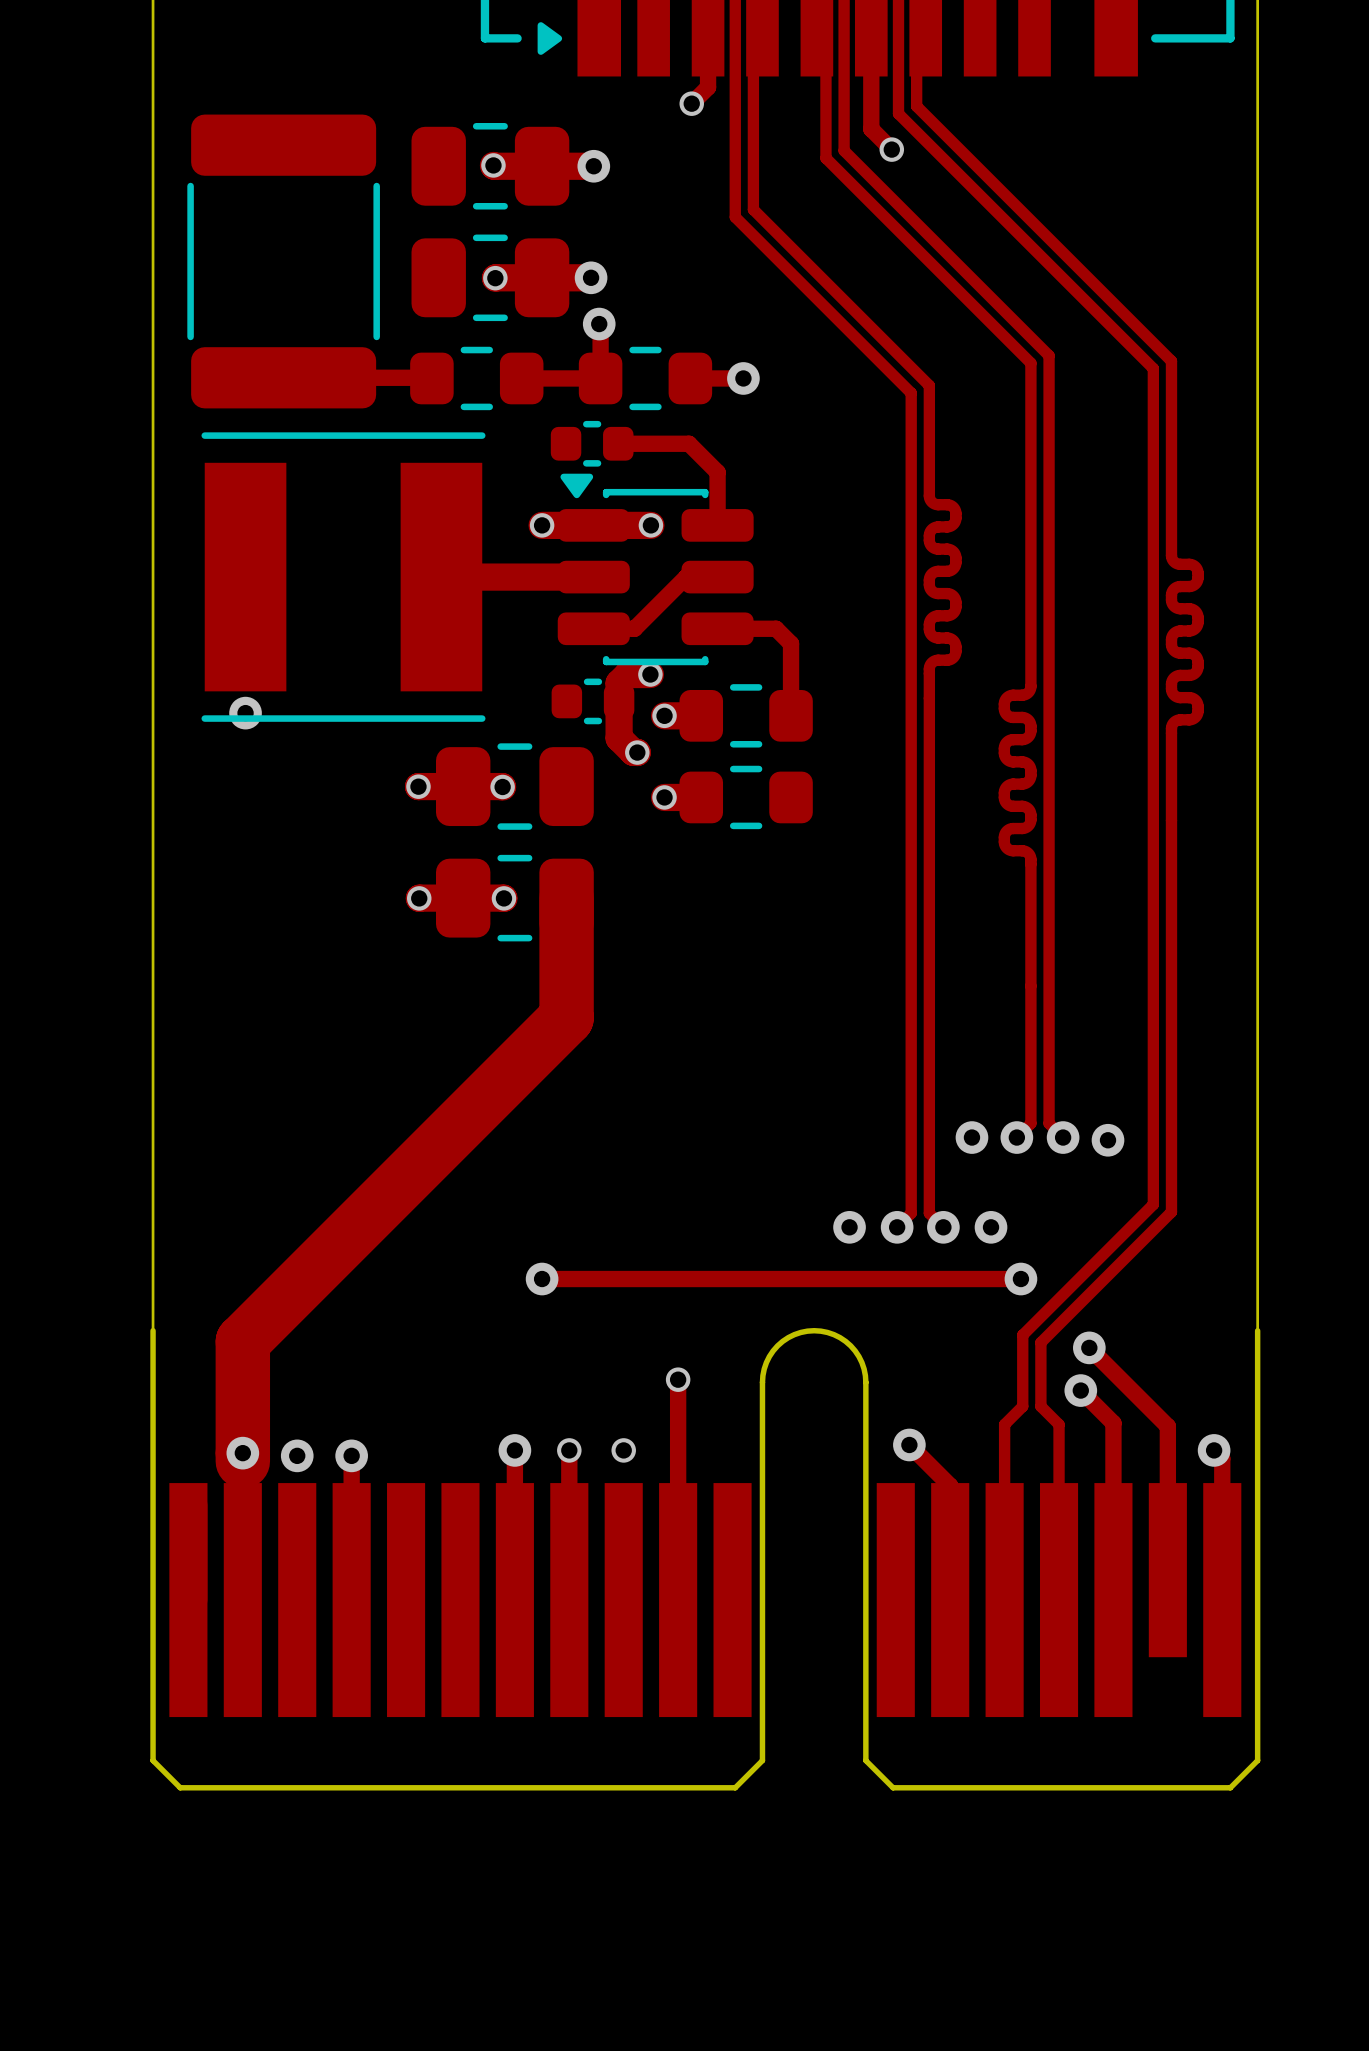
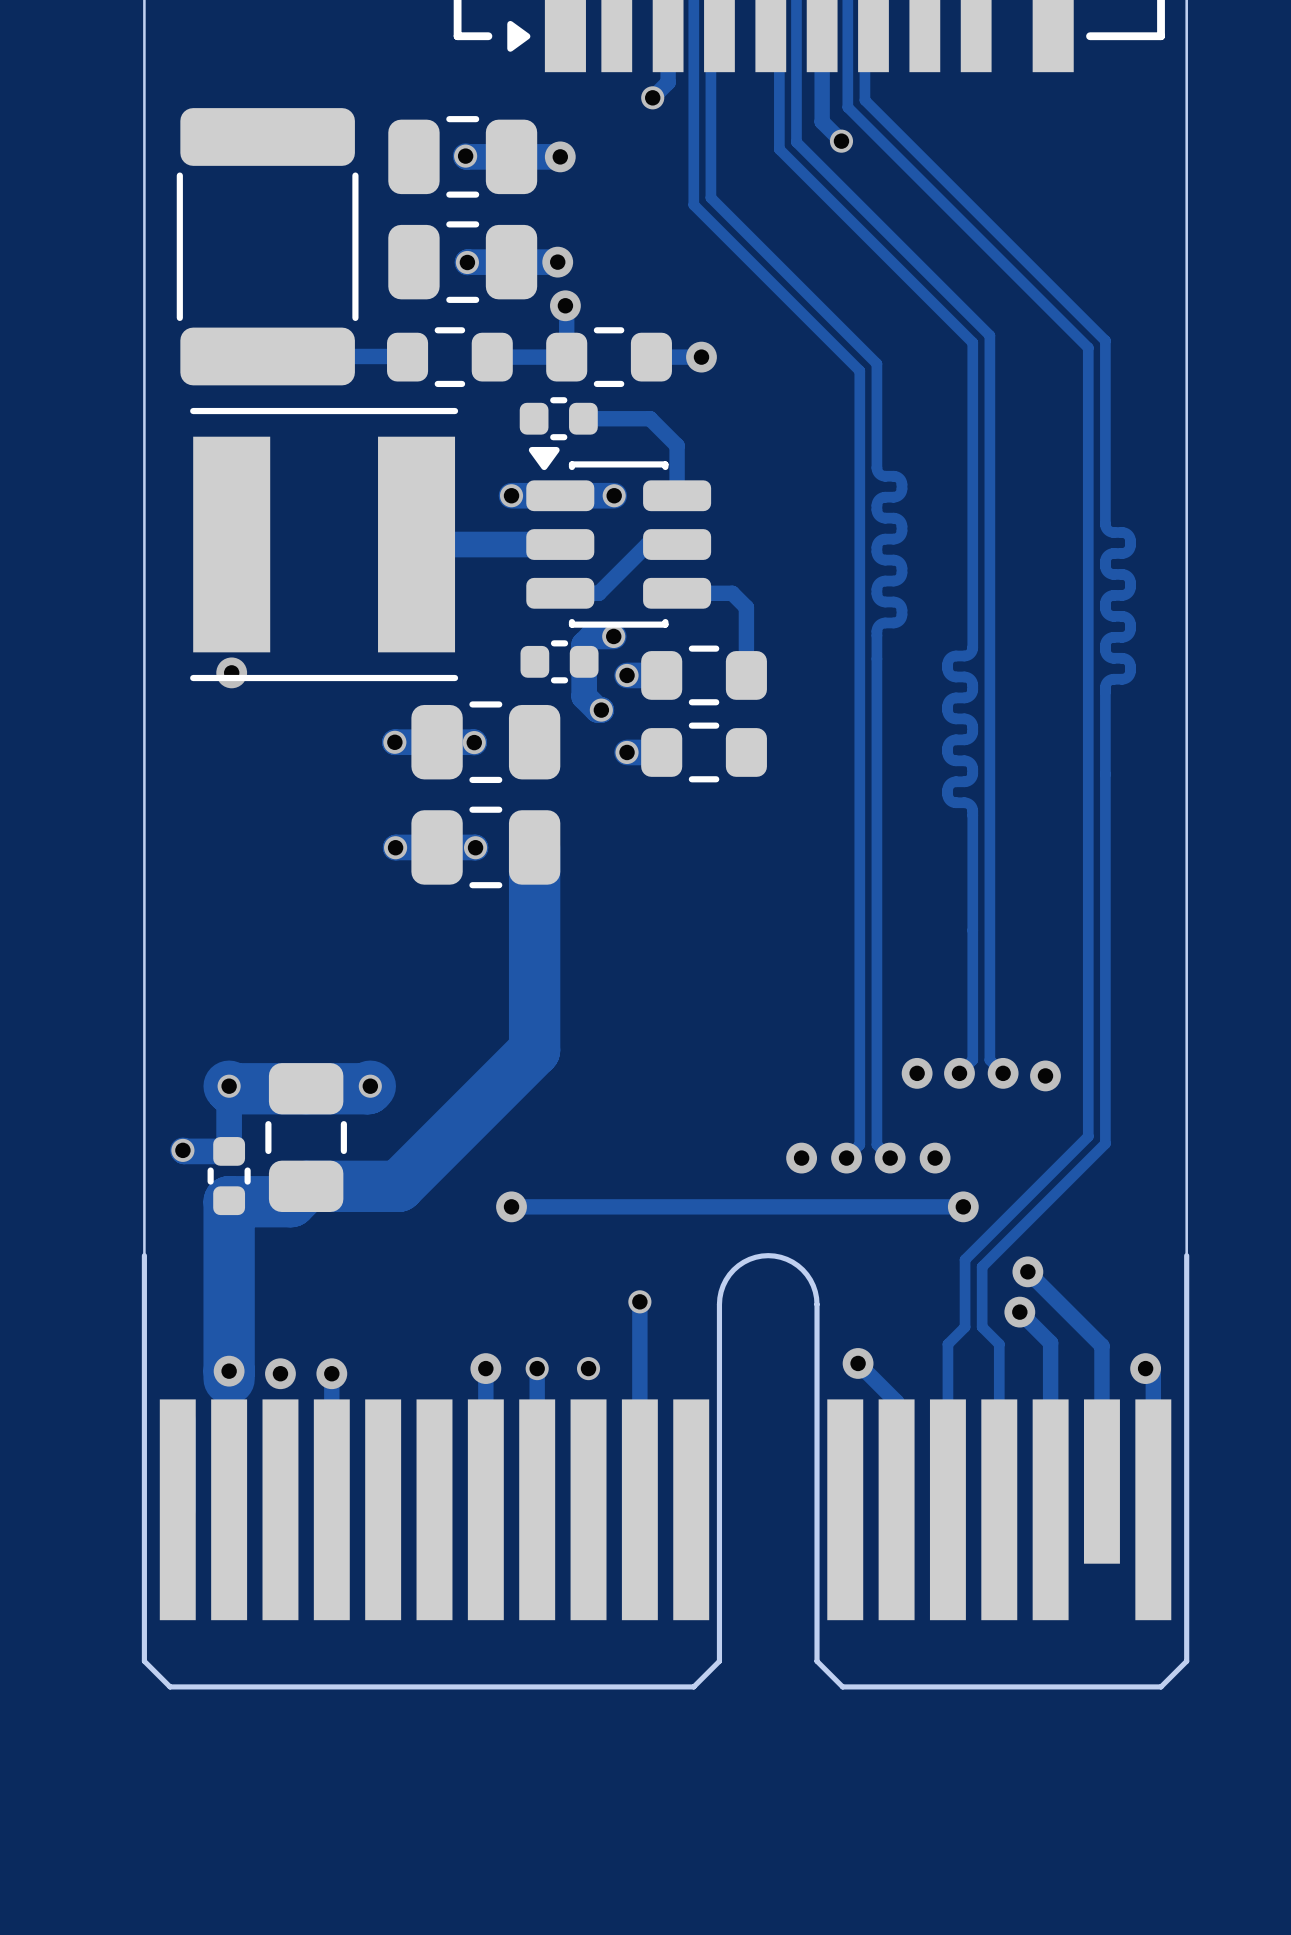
track: (566, 1017) (242, 1341) -> (534, 960) (534, 1050) (398, 1186) (306, 1186) (290, 1201) (229, 1201) (229, 1265)
via: none -> (229, 1086)
track: none -> (370, 1086) (367, 1088) (231, 1088) (229, 1086) (229, 1151) (182, 1150)
via: none -> (370, 1086)
part: none -> (306, 1137)
via: none -> (182, 1150)
part: none -> (229, 1176)

